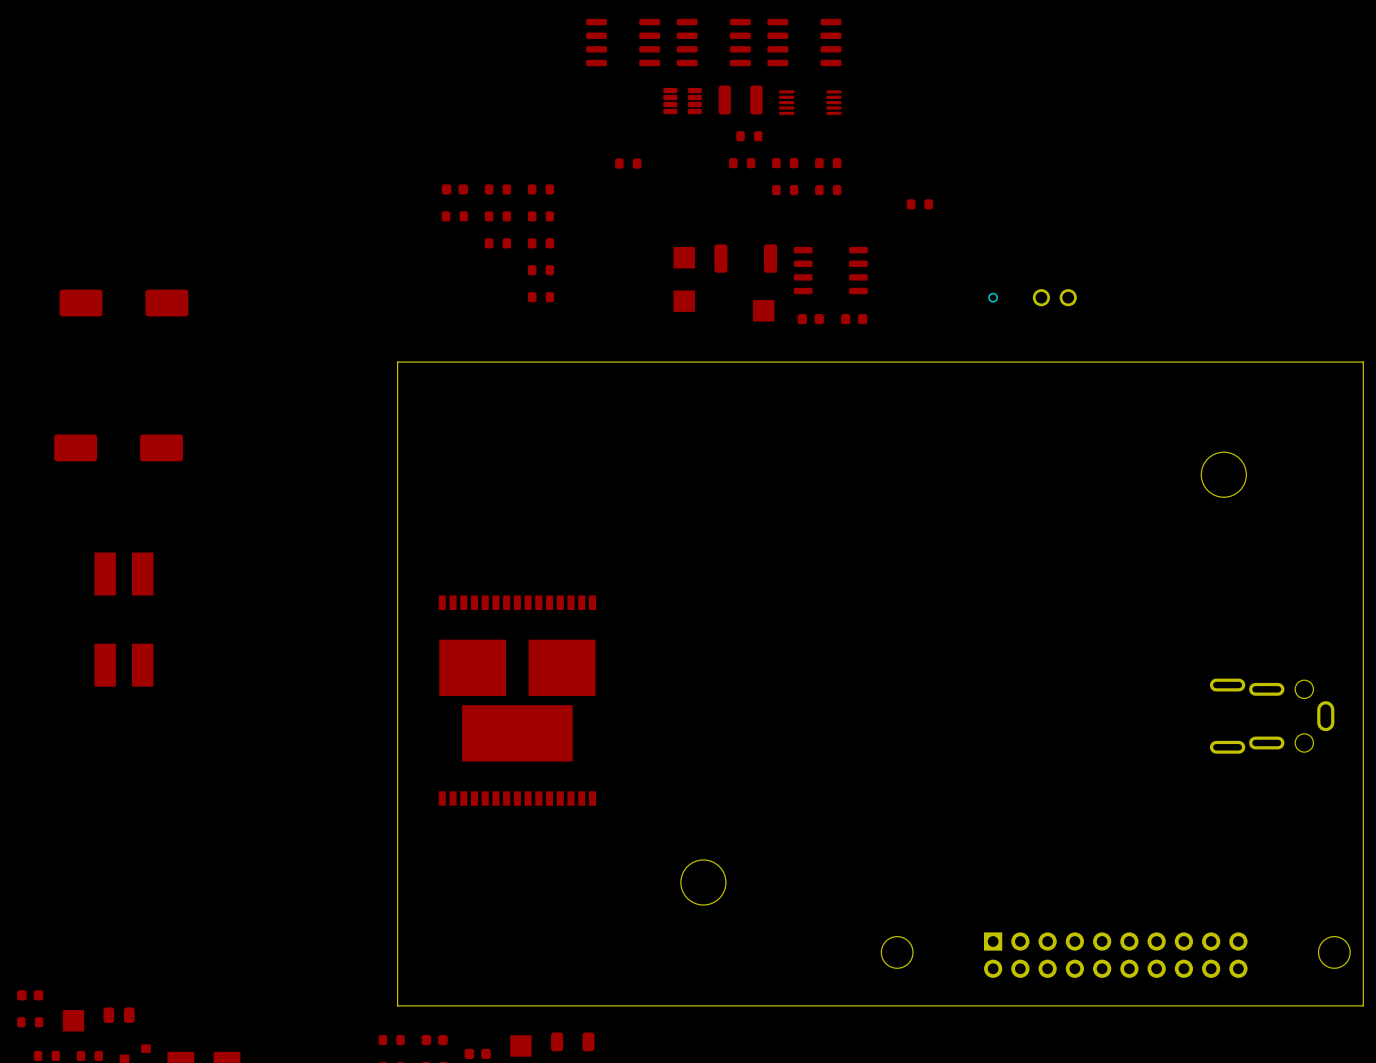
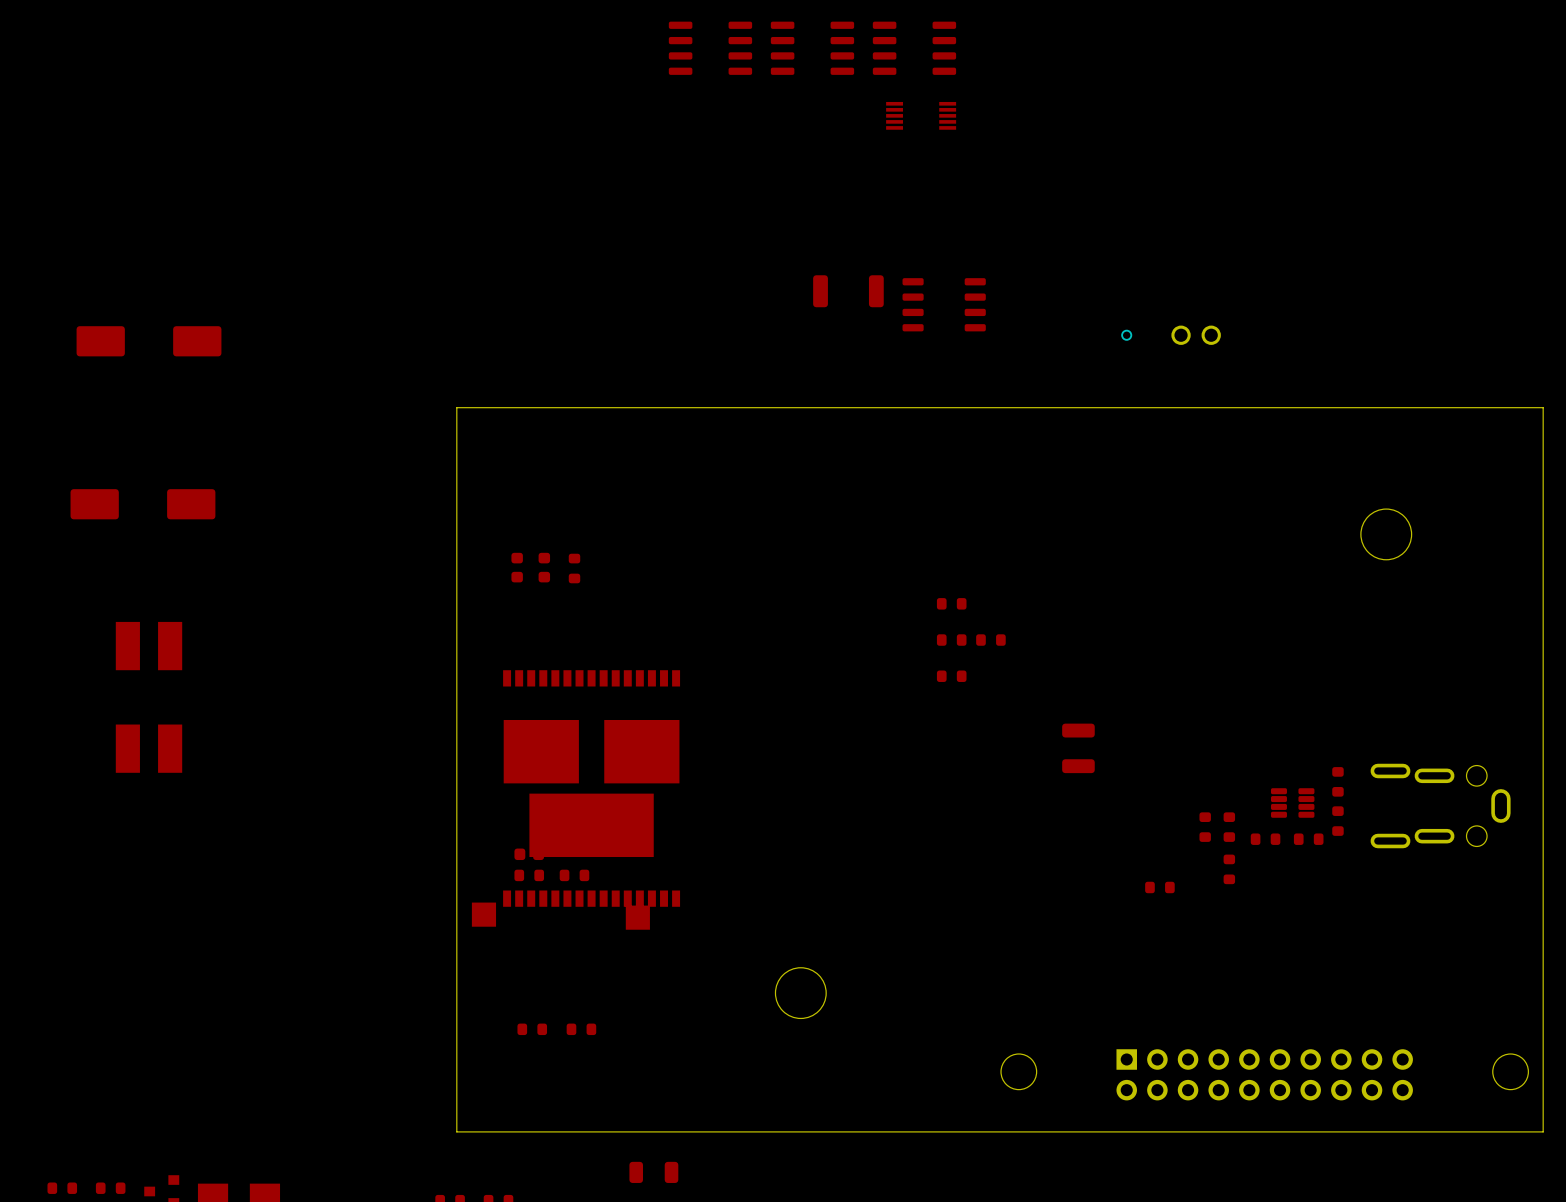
part: (740, 99) -> none
part: (682, 101) -> none
part: (749, 136) -> none
part: (628, 163) -> none
part: (742, 163) -> none
part: (785, 163) -> none
part: (828, 163) -> none
part: (454, 189) -> none
part: (497, 189) -> none
part: (540, 189) -> none
part: (785, 190) -> none
part: (828, 190) -> none
part: (919, 204) -> none
part: (454, 216) -> none
part: (497, 216) -> none
part: (540, 216) -> none
part: (497, 243) -> none
part: (540, 243) -> none
part: (684, 257) -> none
part: (540, 270) -> none
part: (540, 297) -> none
part: (684, 301) -> none
part: (763, 310) -> none
part: (810, 319) -> none
part: (854, 319) -> none
part: none -> (517, 567)
part: none -> (544, 567)
part: none -> (574, 568)
part: none -> (951, 603)
part: none -> (951, 640)
part: none -> (990, 640)
part: none -> (951, 676)
part: none -> (1078, 748)
part: none -> (1337, 781)
part: none -> (1292, 802)
part: none -> (1337, 821)
part: none -> (1205, 827)
part: none -> (1229, 827)
part: none -> (1265, 839)
part: none -> (1308, 839)
part: none -> (529, 854)
part: none -> (1229, 869)
part: none -> (529, 875)
part: none -> (574, 875)
part: none -> (1159, 887)
part: none -> (483, 914)
part: none -> (637, 917)
part: none -> (532, 1029)
part: none -> (581, 1029)
part: (30, 995) -> none
part: (119, 1015) -> none
part: (73, 1020) -> none
part: (30, 1022) -> none
part: (391, 1040) -> none
part: (434, 1040) -> none
part: (520, 1045) -> none
part: (477, 1053) -> none

